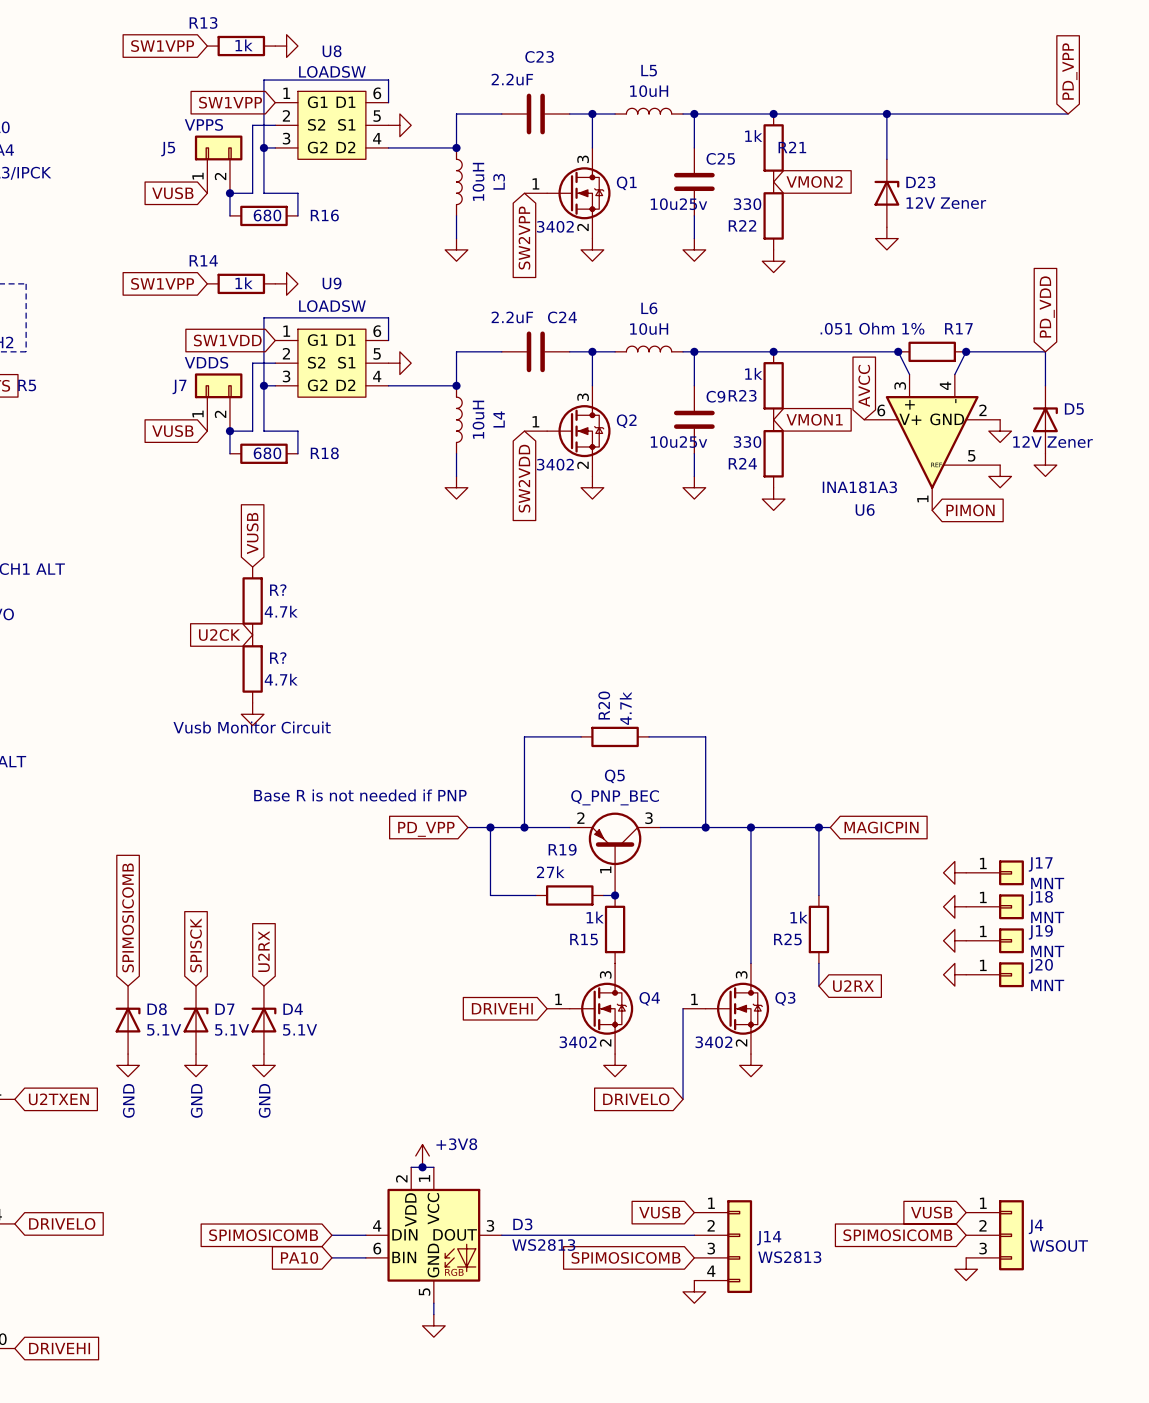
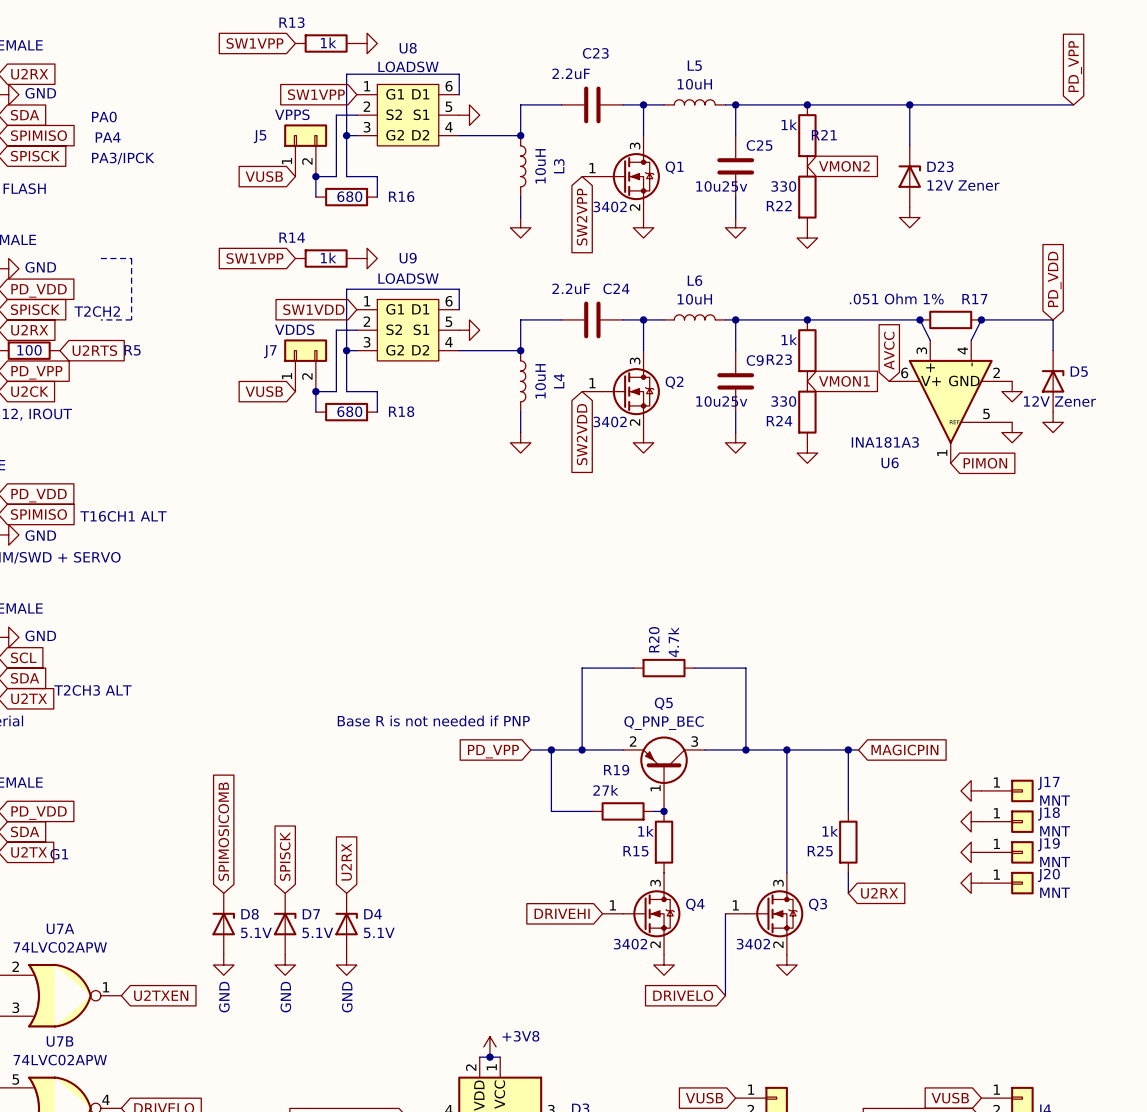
global label: VUSB (252, 533) -> none
R?: 4.7k (252, 601) -> none
global label: U2CK (219, 634) -> none
R?: 4.7k (252, 668) -> none
power symbol: (252, 714) -> none
text: Vusb Monitor Circuit (252, 727) -> none

